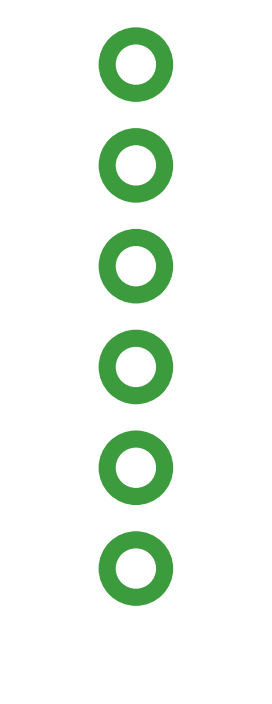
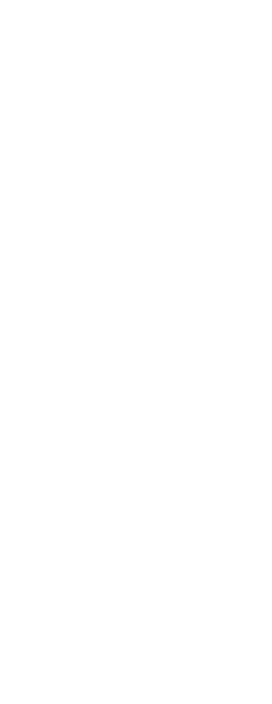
via: (135, 64) -> none
via: (135, 165) -> none
via: (135, 266) -> none
via: (135, 366) -> none
via: (135, 467) -> none
via: (135, 568) -> none

